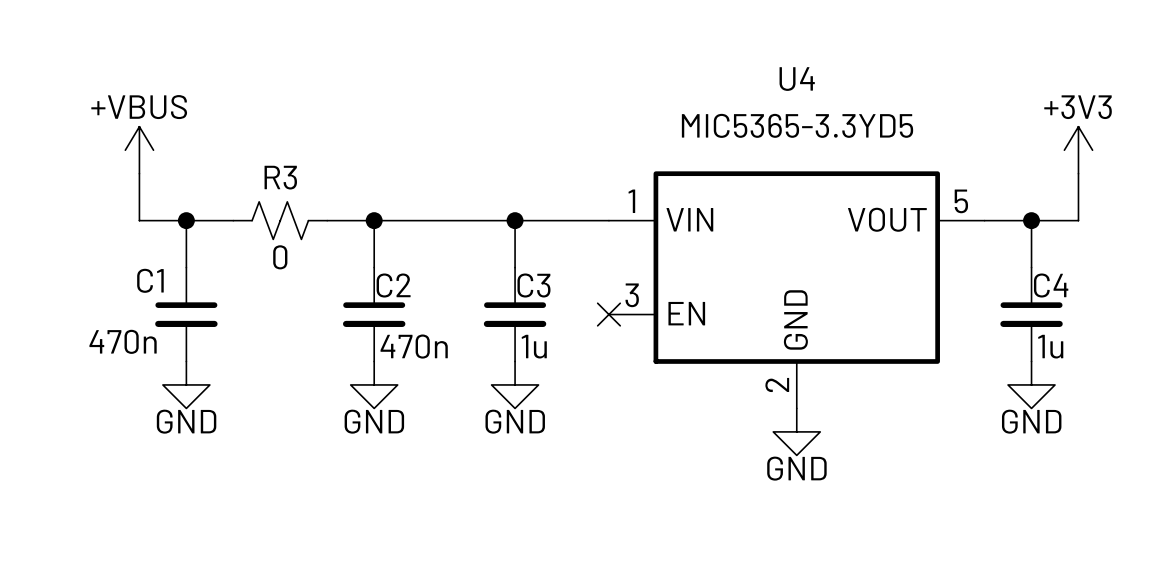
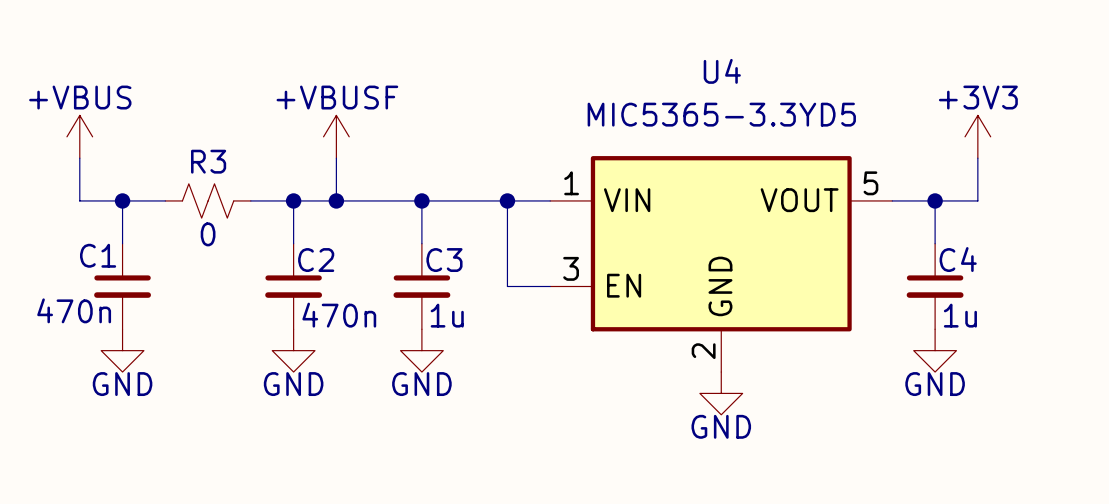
power symbol position: +VBUS (139, 150) -> +VBUS (79, 136)
power symbol: none -> +VBUSF (336, 136)
wire: none -> (79, 158) (79, 200) (122, 200) (122, 243)
wire: (139, 173) (139, 220) -> none
junction position: (186, 220) -> (122, 200)
wire: (233, 220) (186, 220) (186, 267) -> none
wire: none -> (250, 200) (293, 200) (293, 243)
R3 position: (280, 220) -> (208, 200)
junction: none -> (293, 200)
wire: (374, 220) (374, 267) -> (336, 200) (336, 158)
junction: none -> (421, 200)
wire: (515, 220) (515, 267) -> (421, 200) (421, 243)
junction: (515, 220) -> none
wire: none -> (507, 200) (507, 286) (550, 286)
junction: none -> (507, 200)
C1 position: (186, 314) -> (122, 286)
C2 position: (374, 314) -> (293, 286)
C3 position: (515, 314) -> (421, 286)
no-connect mark: (608, 314) -> none
power symbol position: GND (186, 384) -> GND (122, 350)
power symbol: none -> GND (293, 350)
power symbol: GND (374, 384) -> none
power symbol: none -> GND (421, 350)
power symbol: GND (515, 384) -> none

